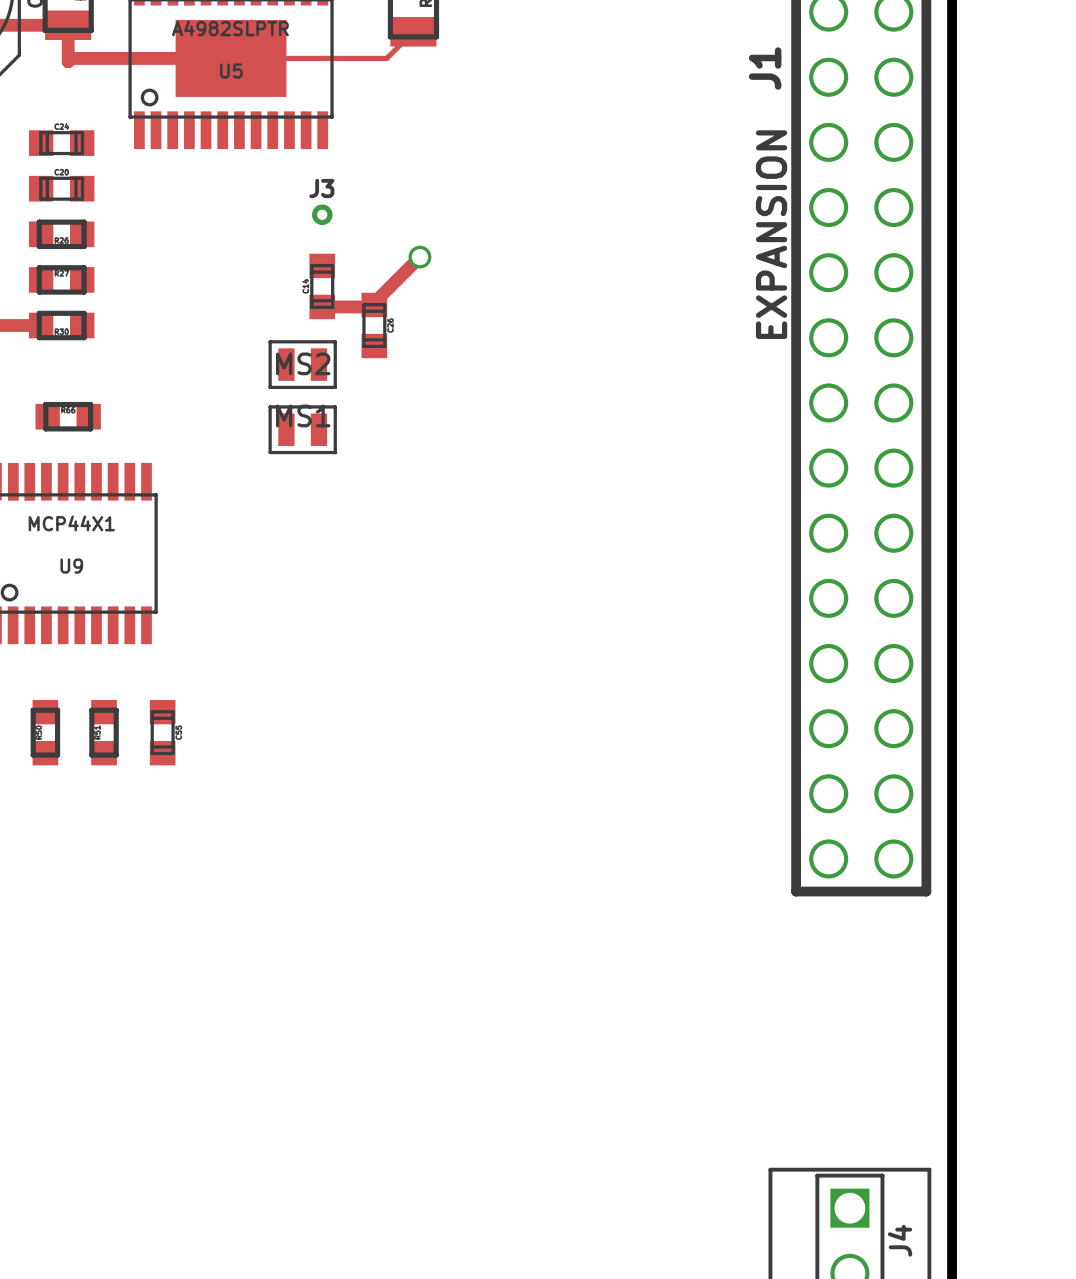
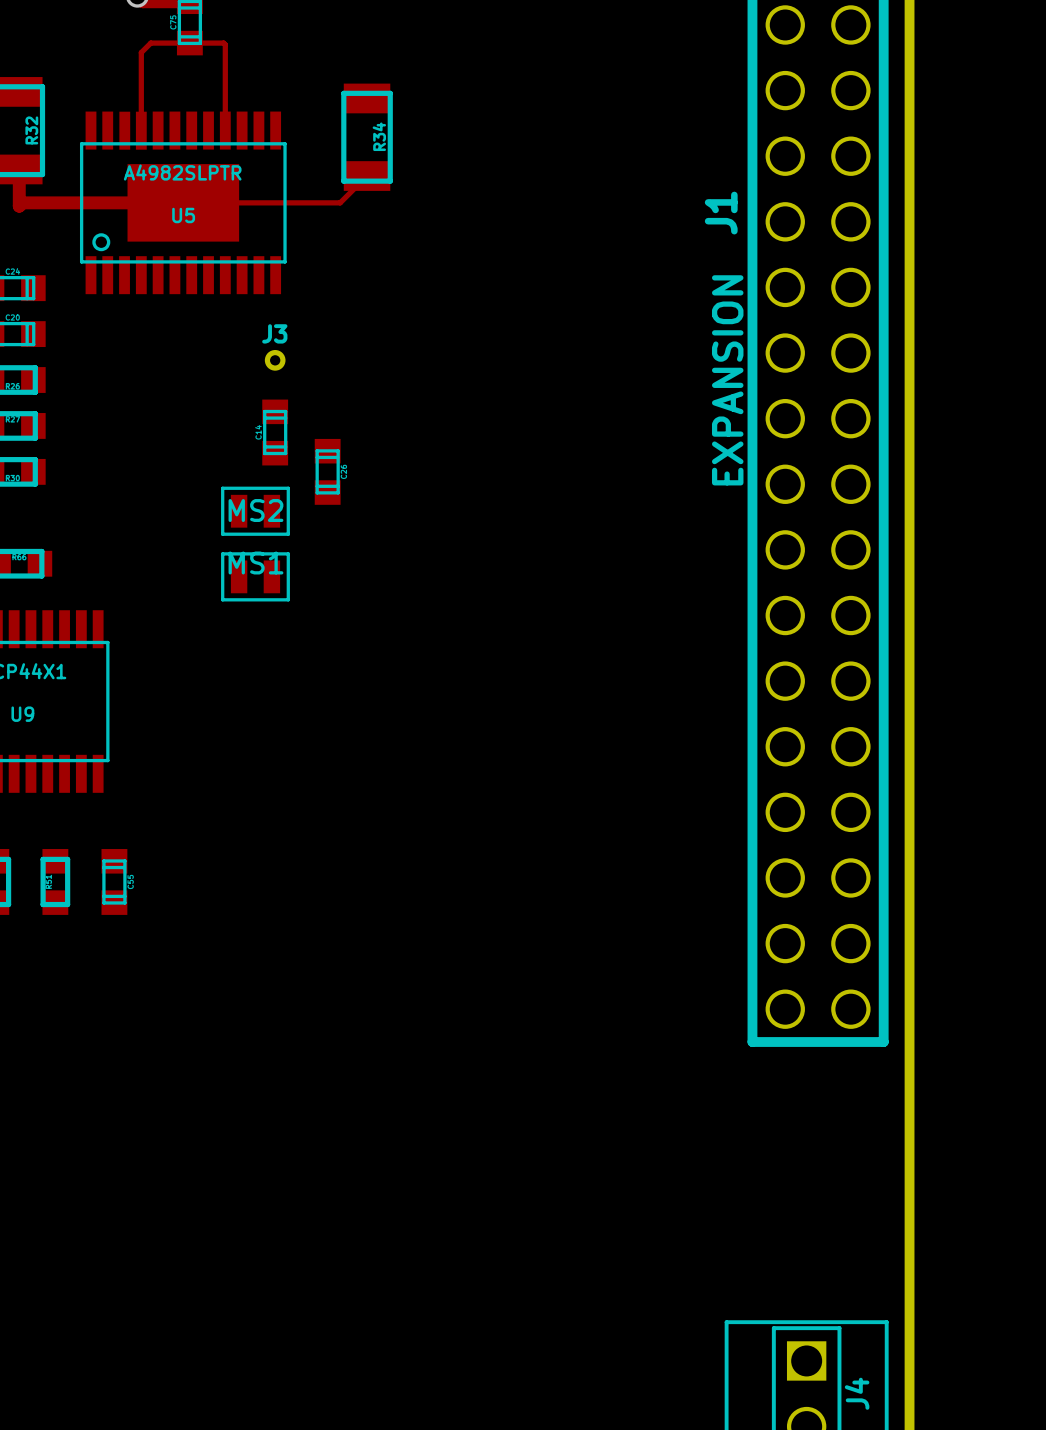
track: (419, 257) (374, 302) (372, 306) (322, 306) -> none
via: (419, 257) -> none

